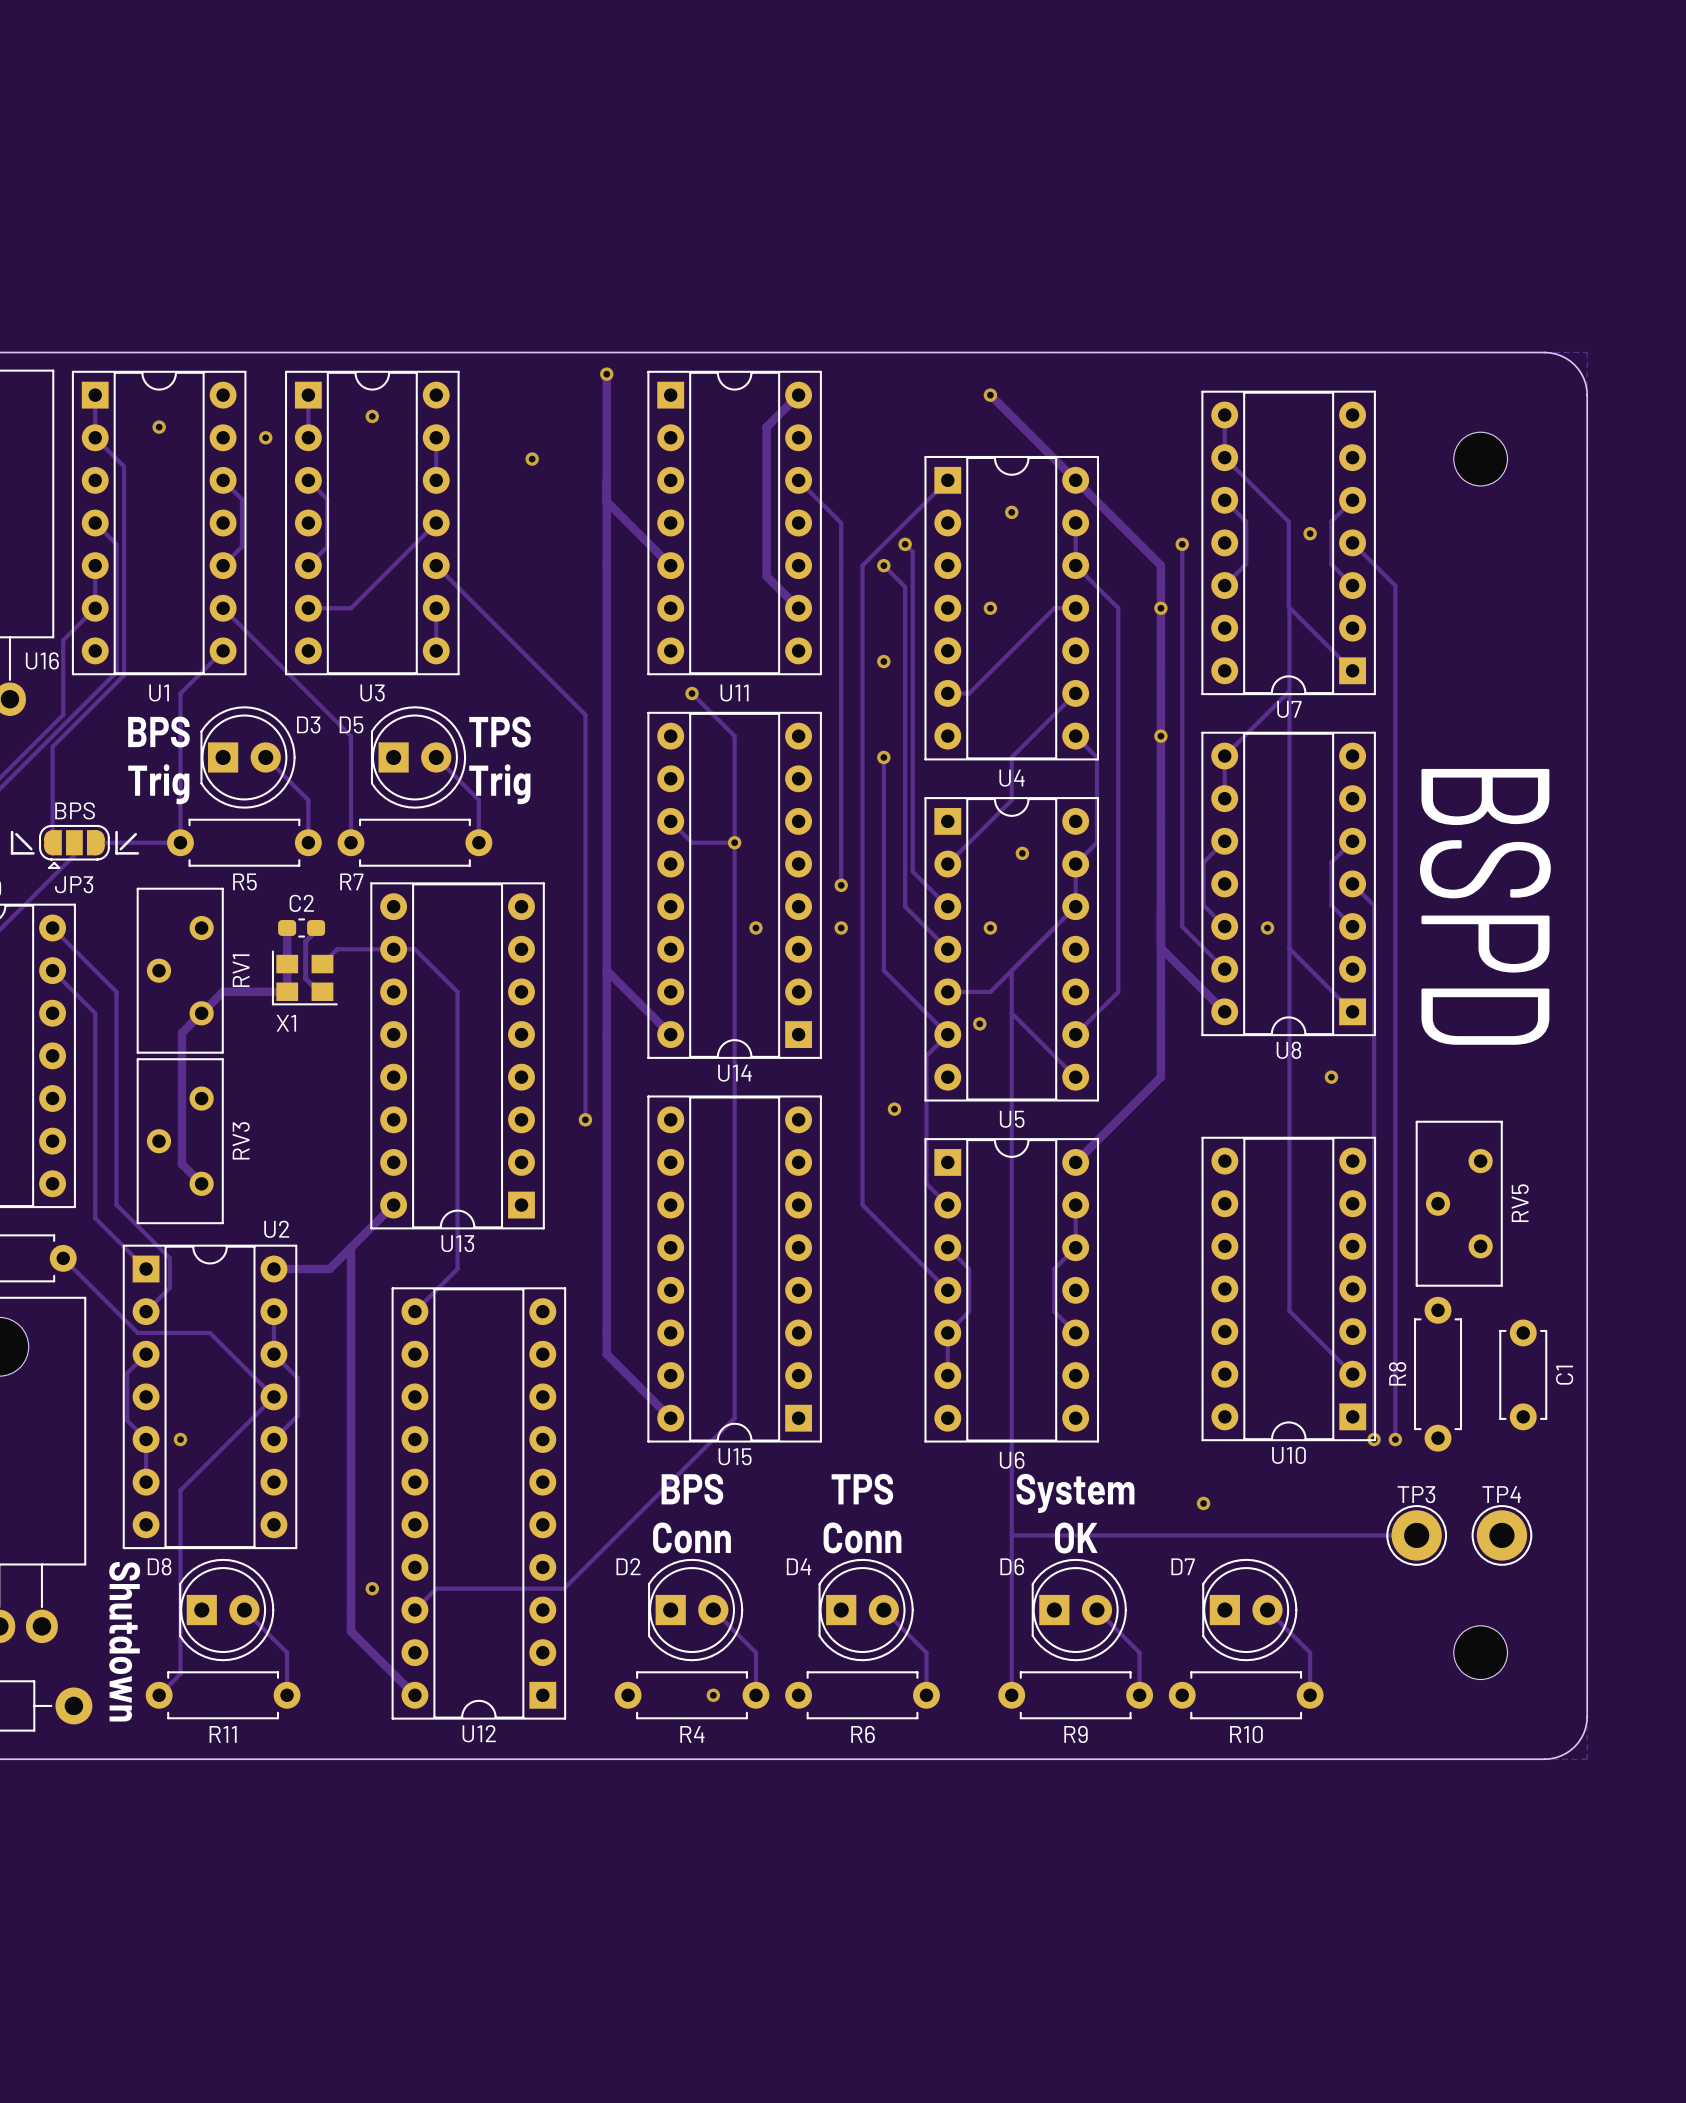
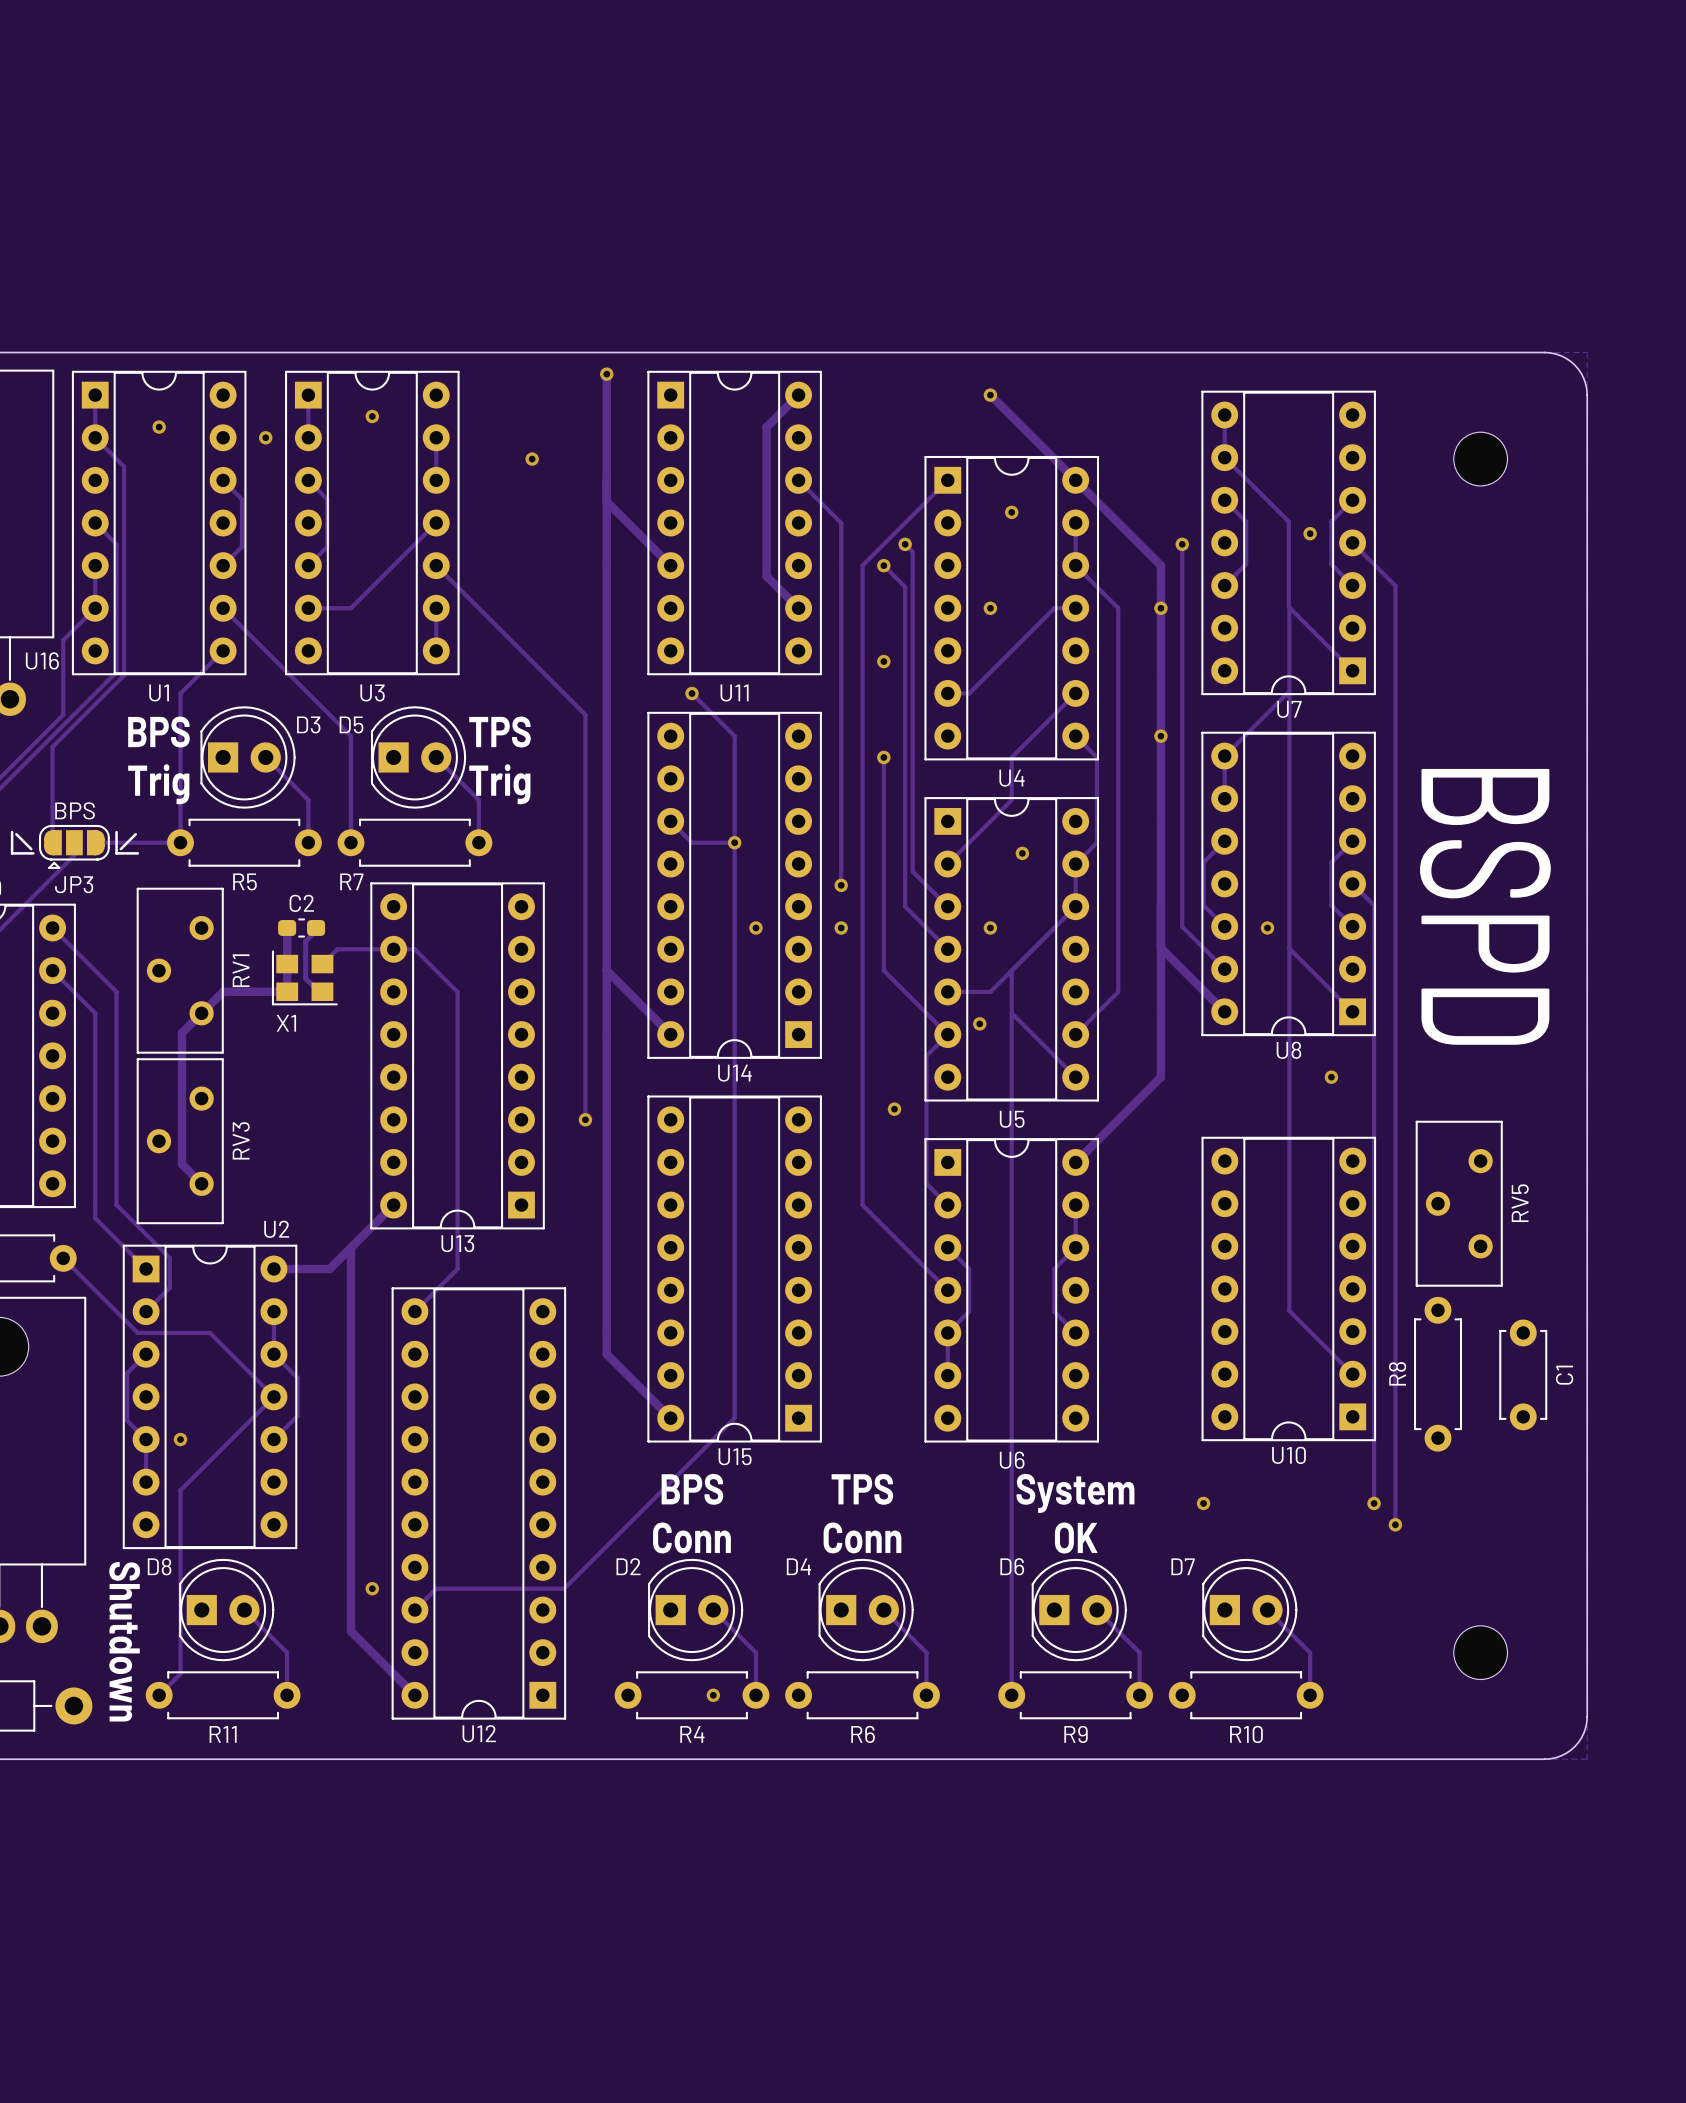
track: none -> (1374, 1439) (1374, 1503)
via: (1374, 1439) -> none
track: none -> (1395, 1439) (1395, 1524)
via: (1395, 1439) -> none
via: none -> (1374, 1503)
via: none -> (1395, 1524)
track: (1011, 1535) (1416, 1535) -> none
TP3: (1416, 1535) -> none
TP4: (1501, 1535) -> none

